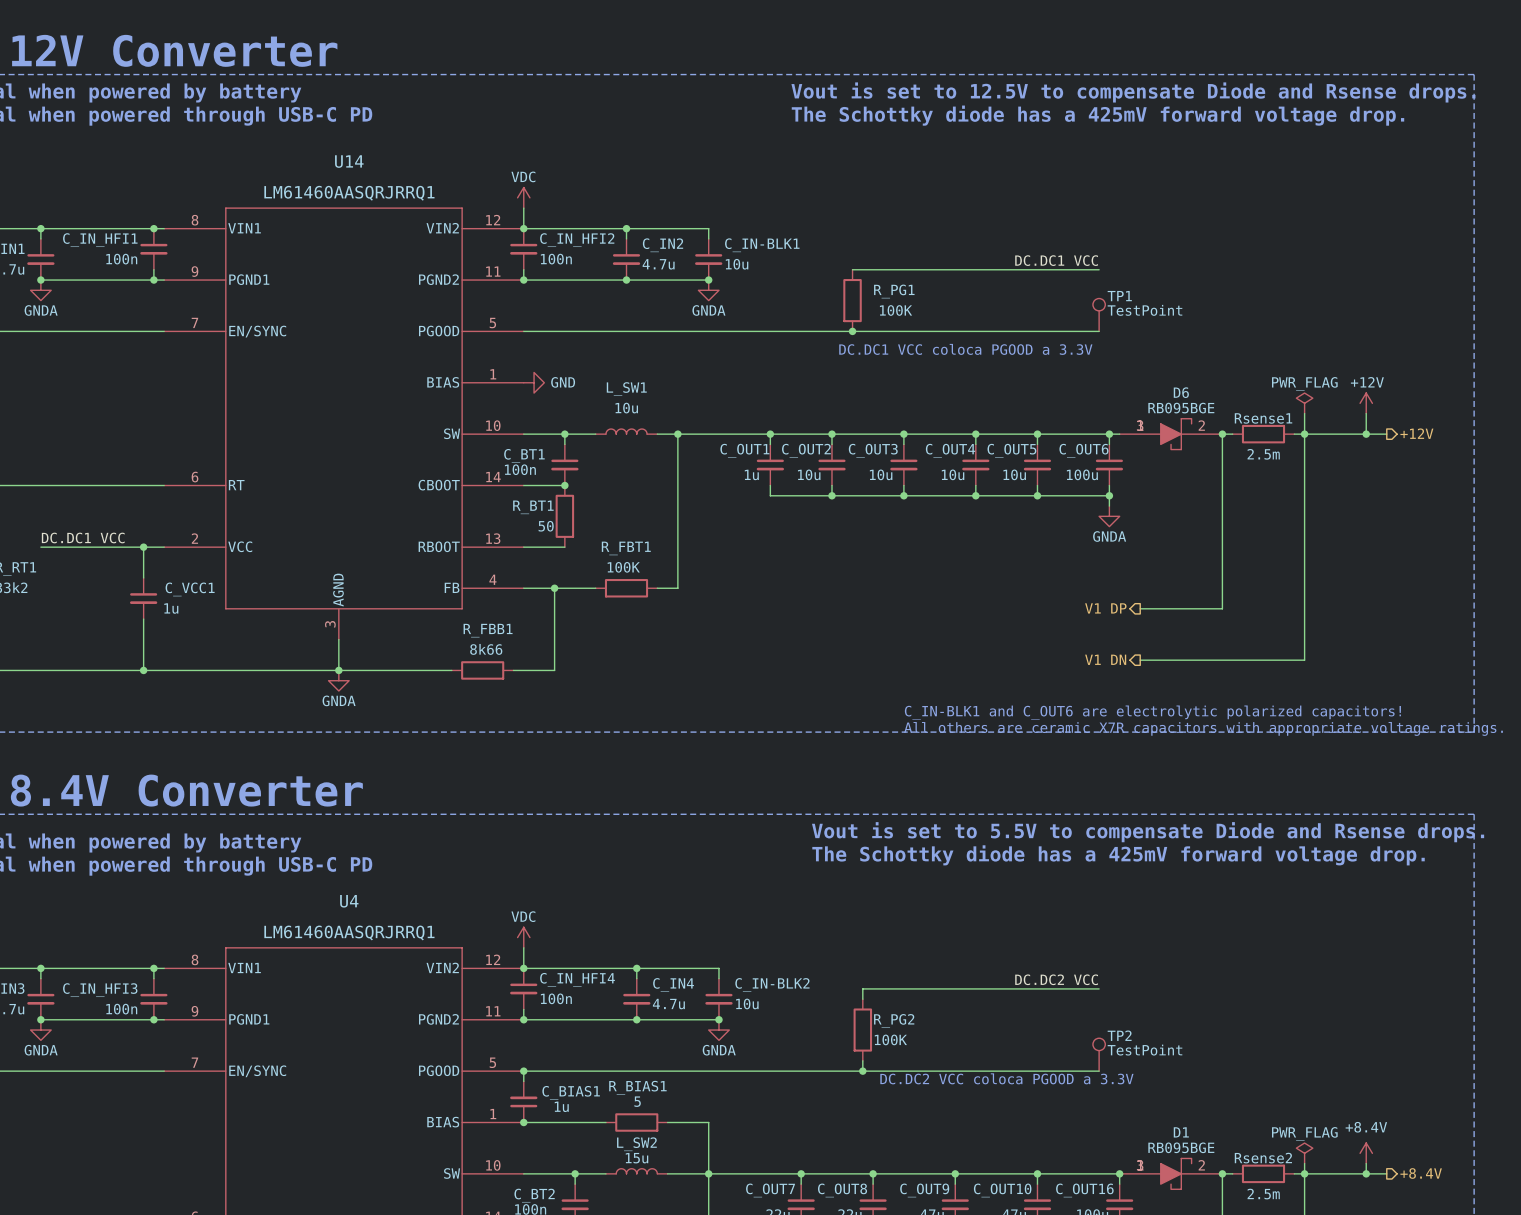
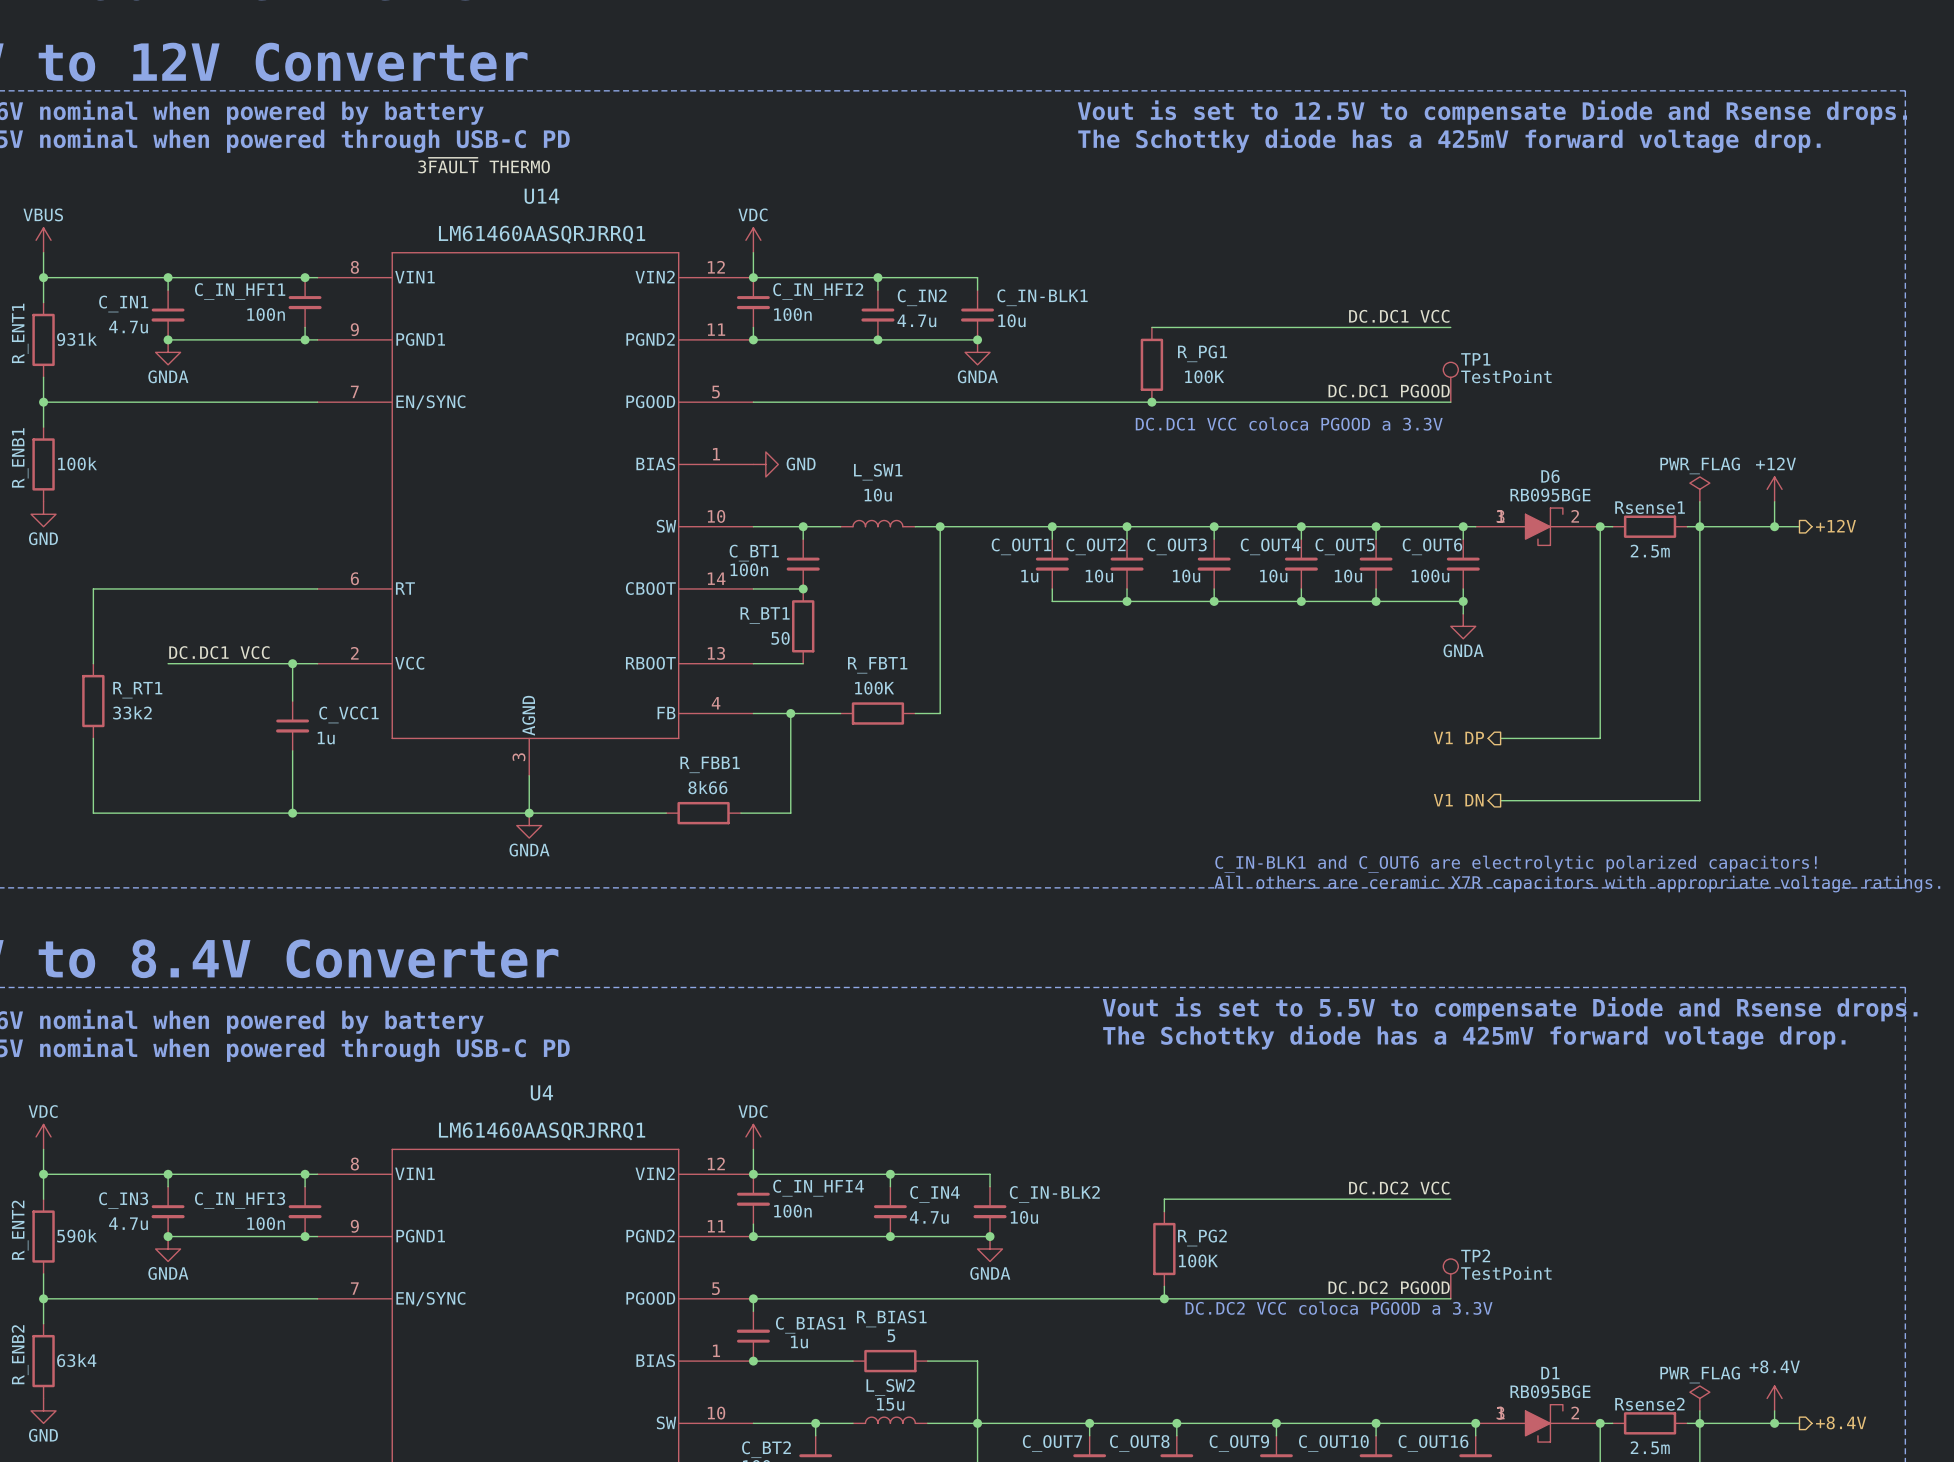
label: none -> 3~{FAULT} THERMO (484, 165)
label: none -> DC.DC1 PGOOD (1389, 391)
label: none -> DC.DC2 PGOOD (1389, 1287)

